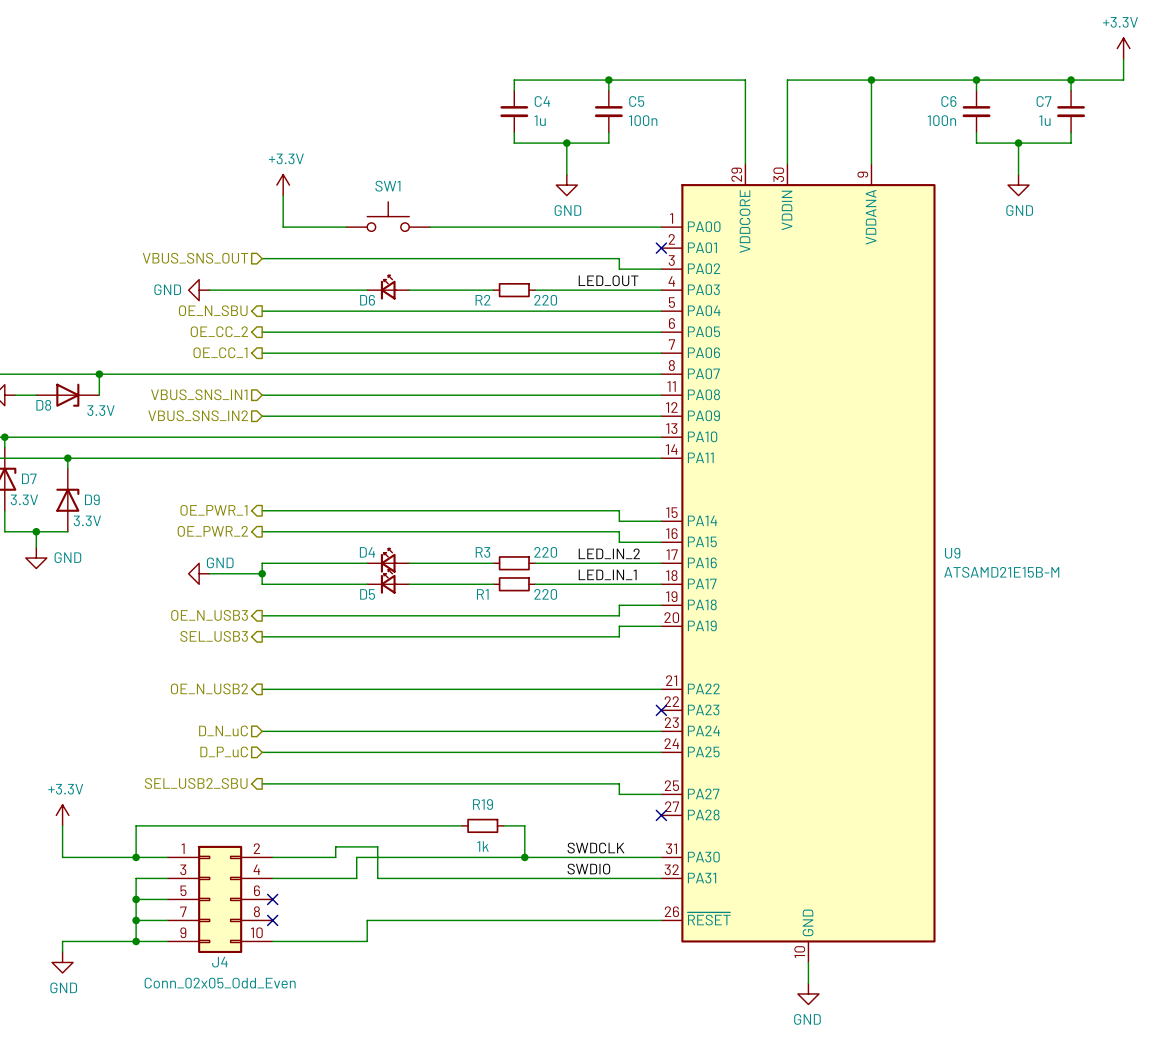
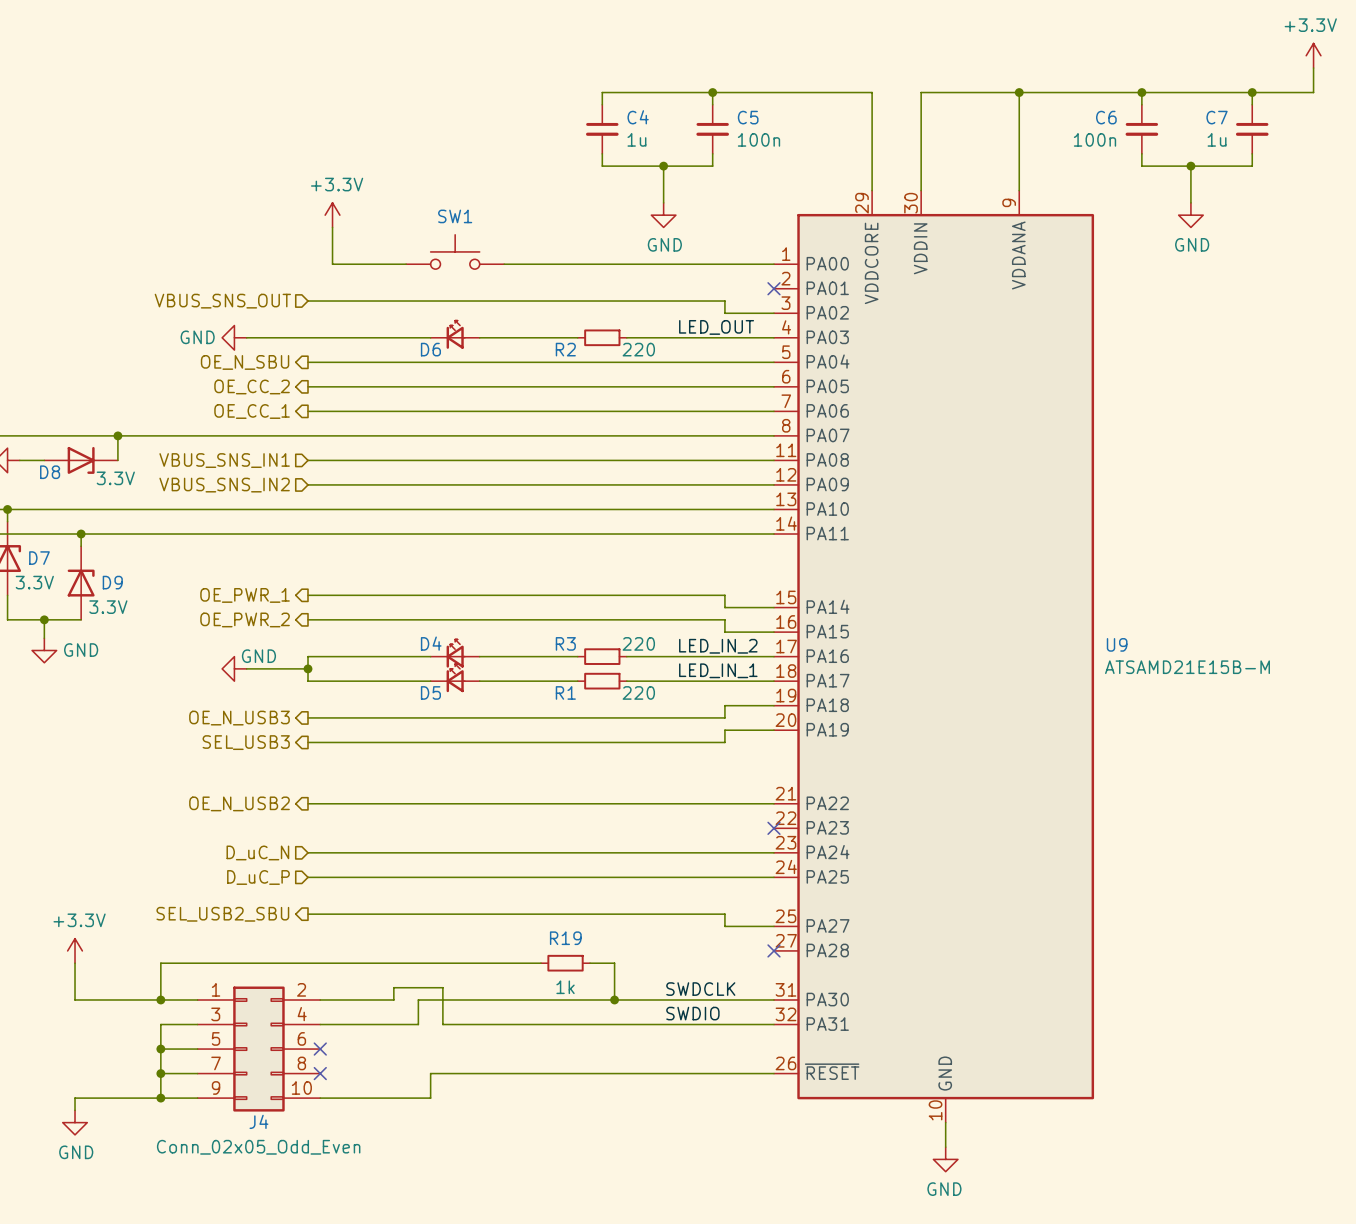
hierarchical label: D_N_uC (223, 730) -> D_uC_N (257, 852)
hierarchical label: D_P_uC (224, 751) -> D_uC_P (258, 877)

